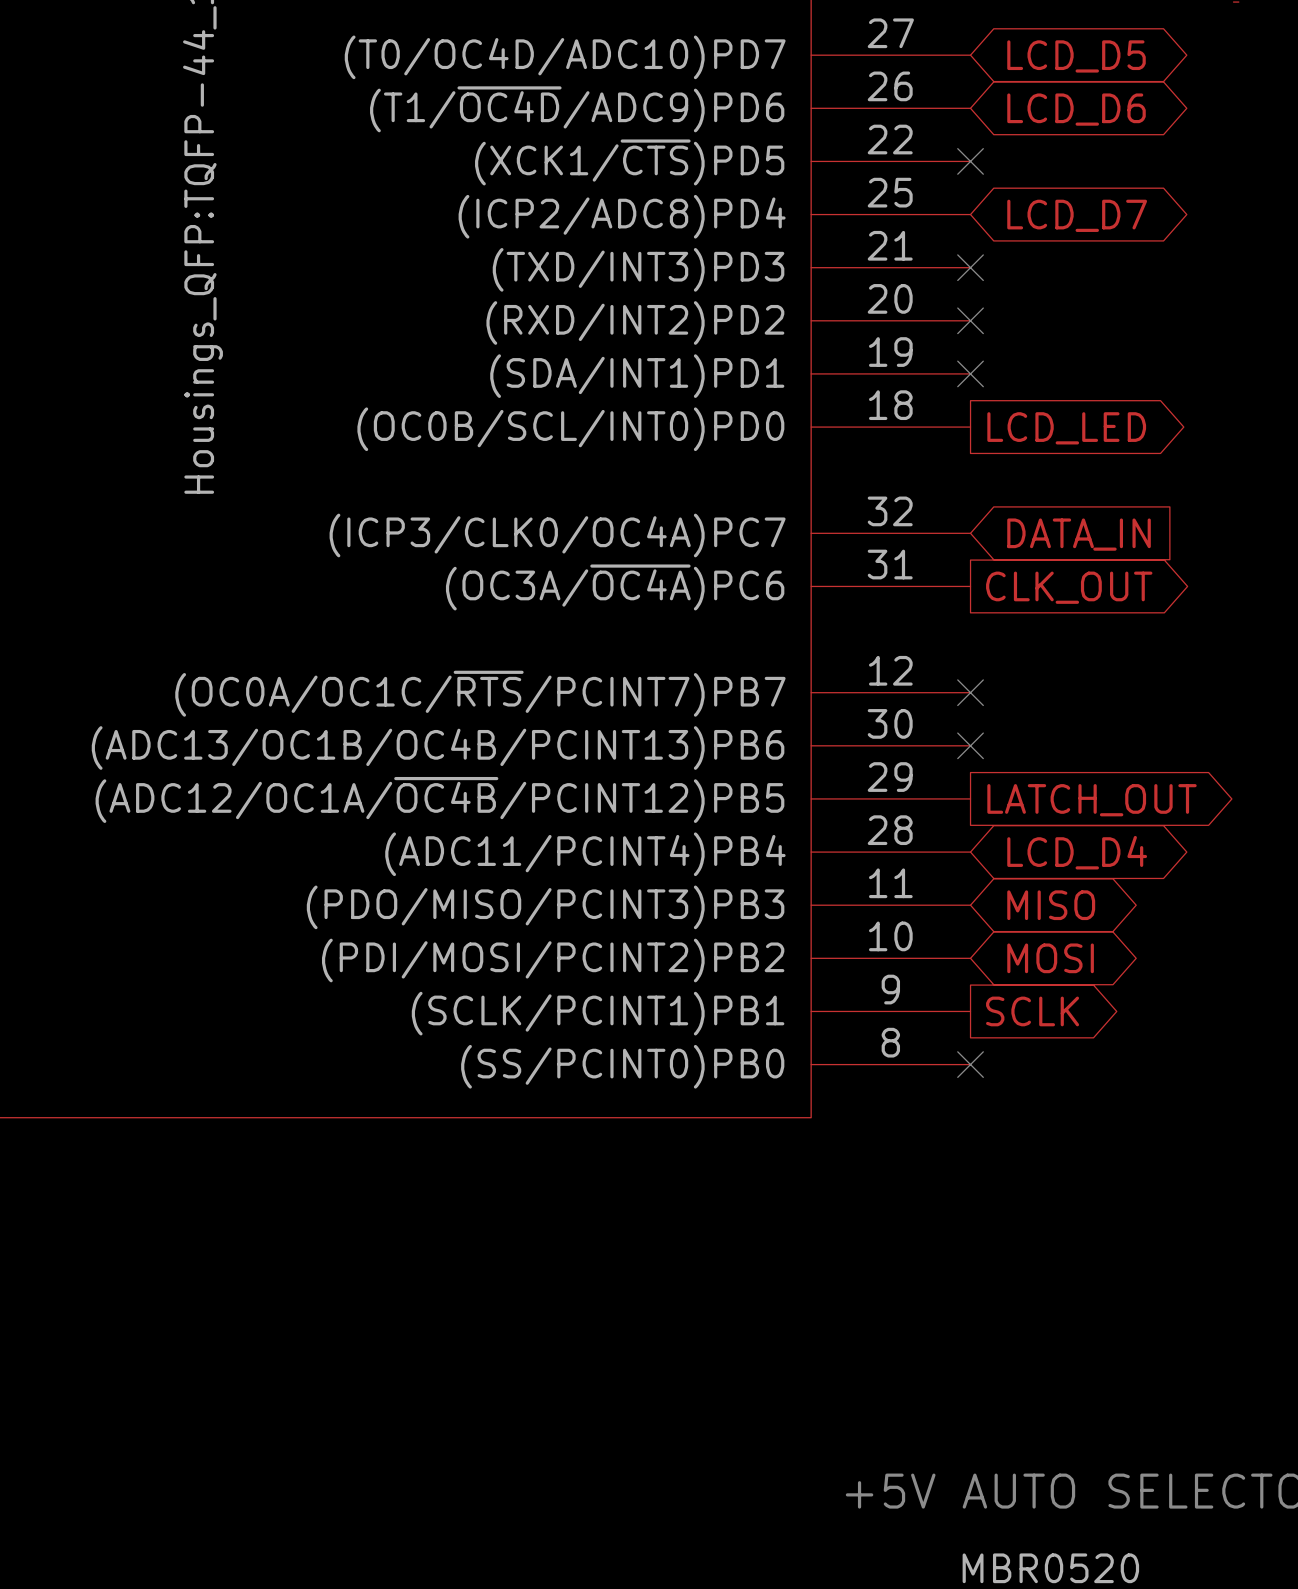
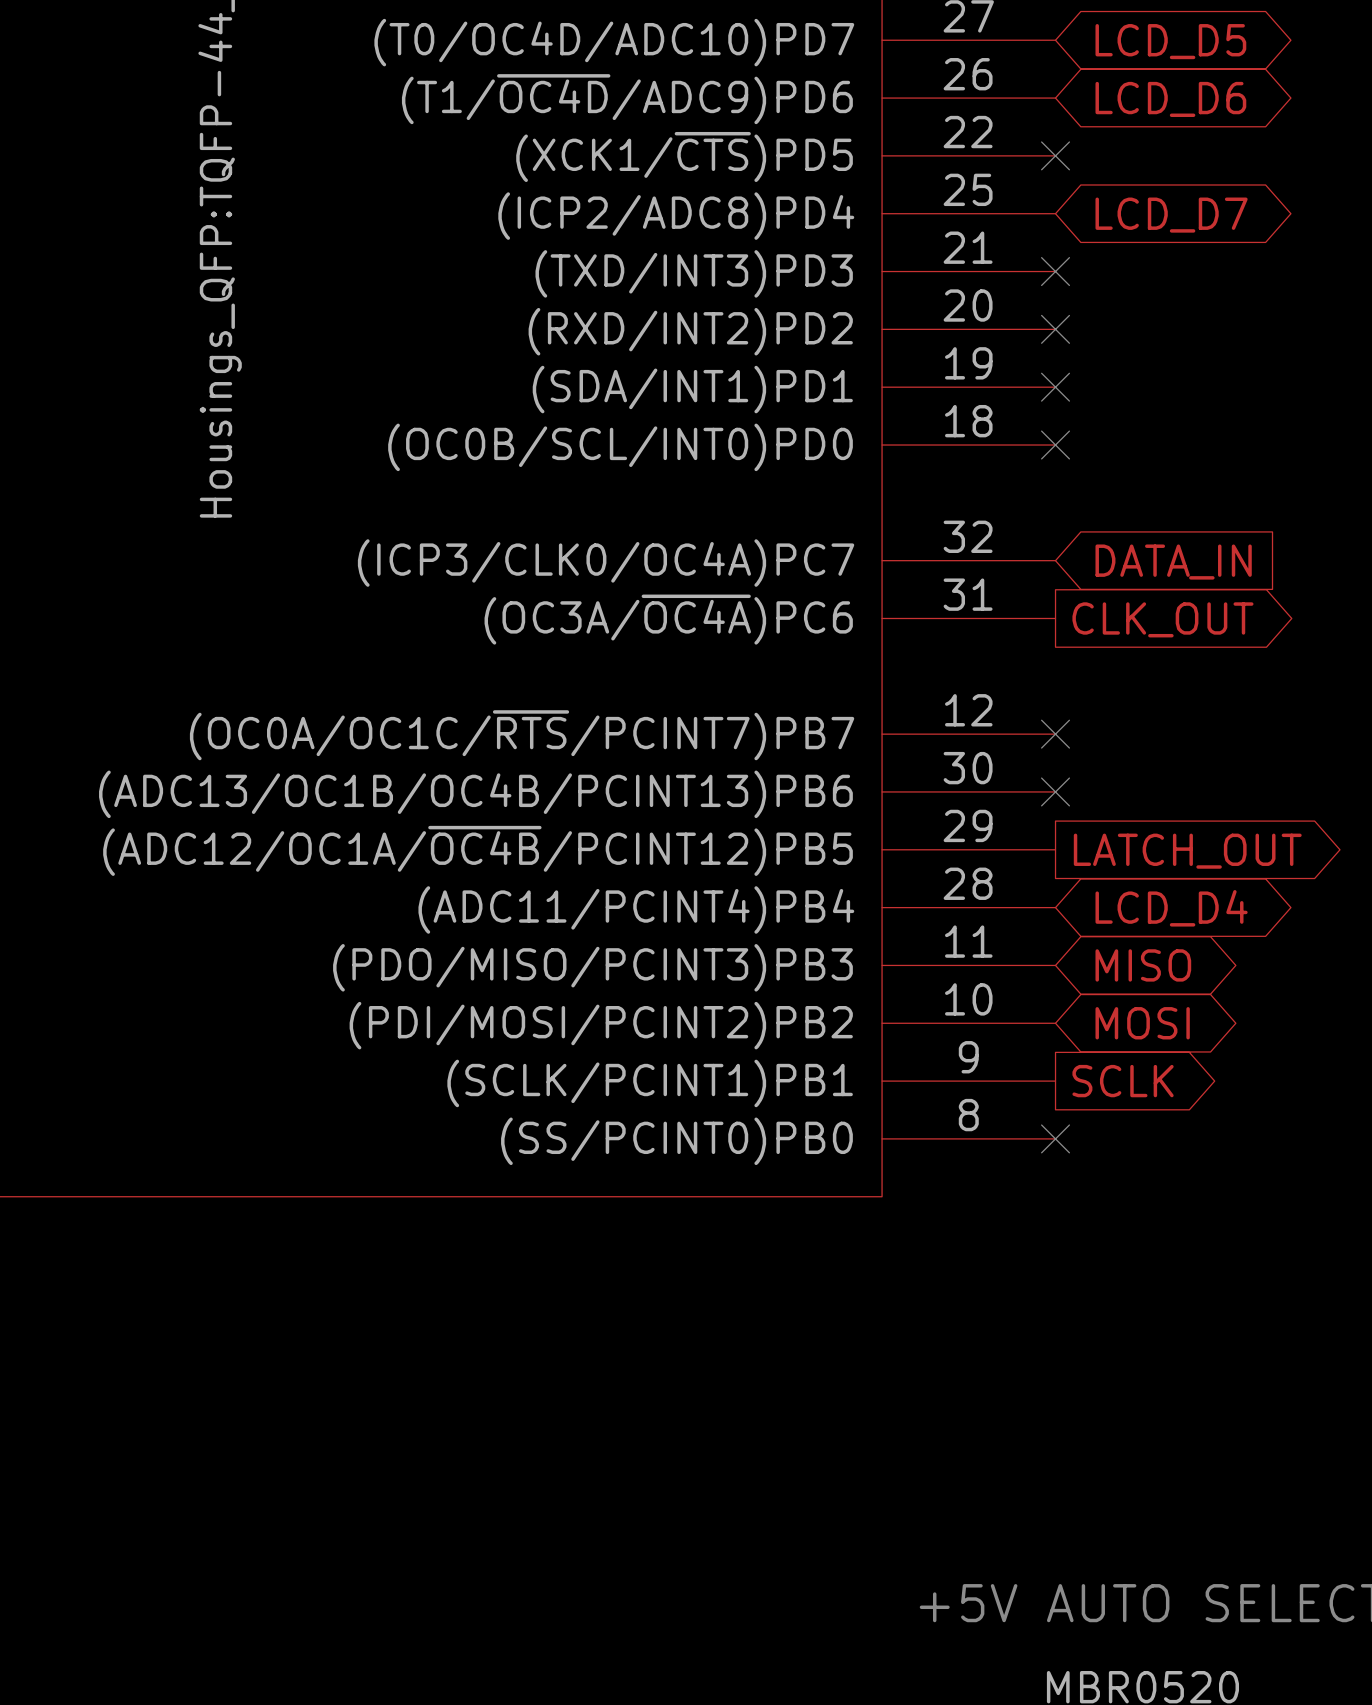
no-connect mark: none -> (1055, 445)
global label: LCD_LED (1066, 428) -> none

